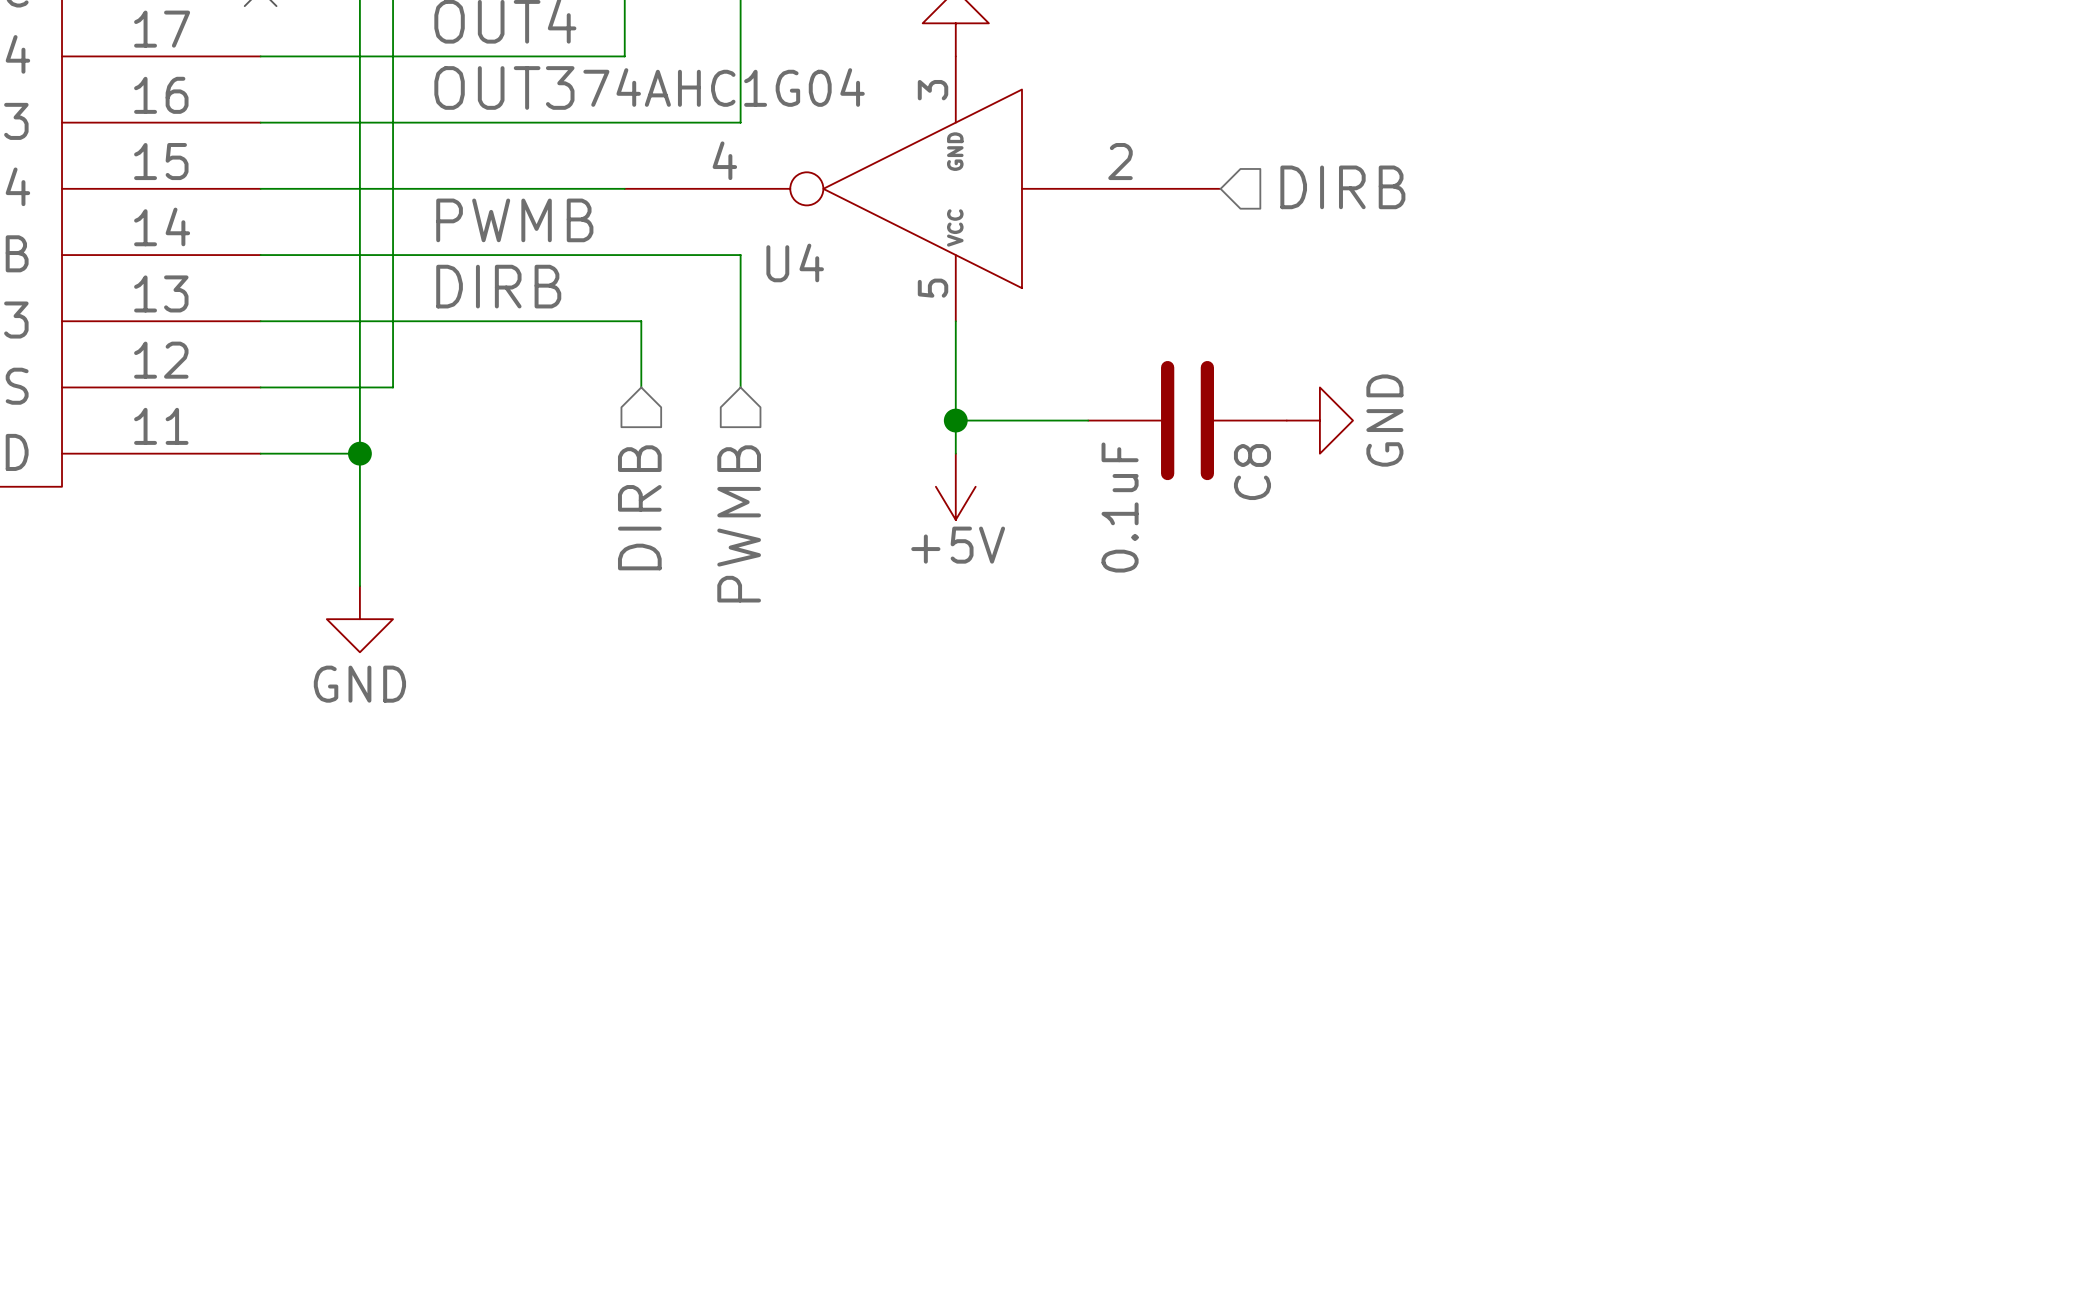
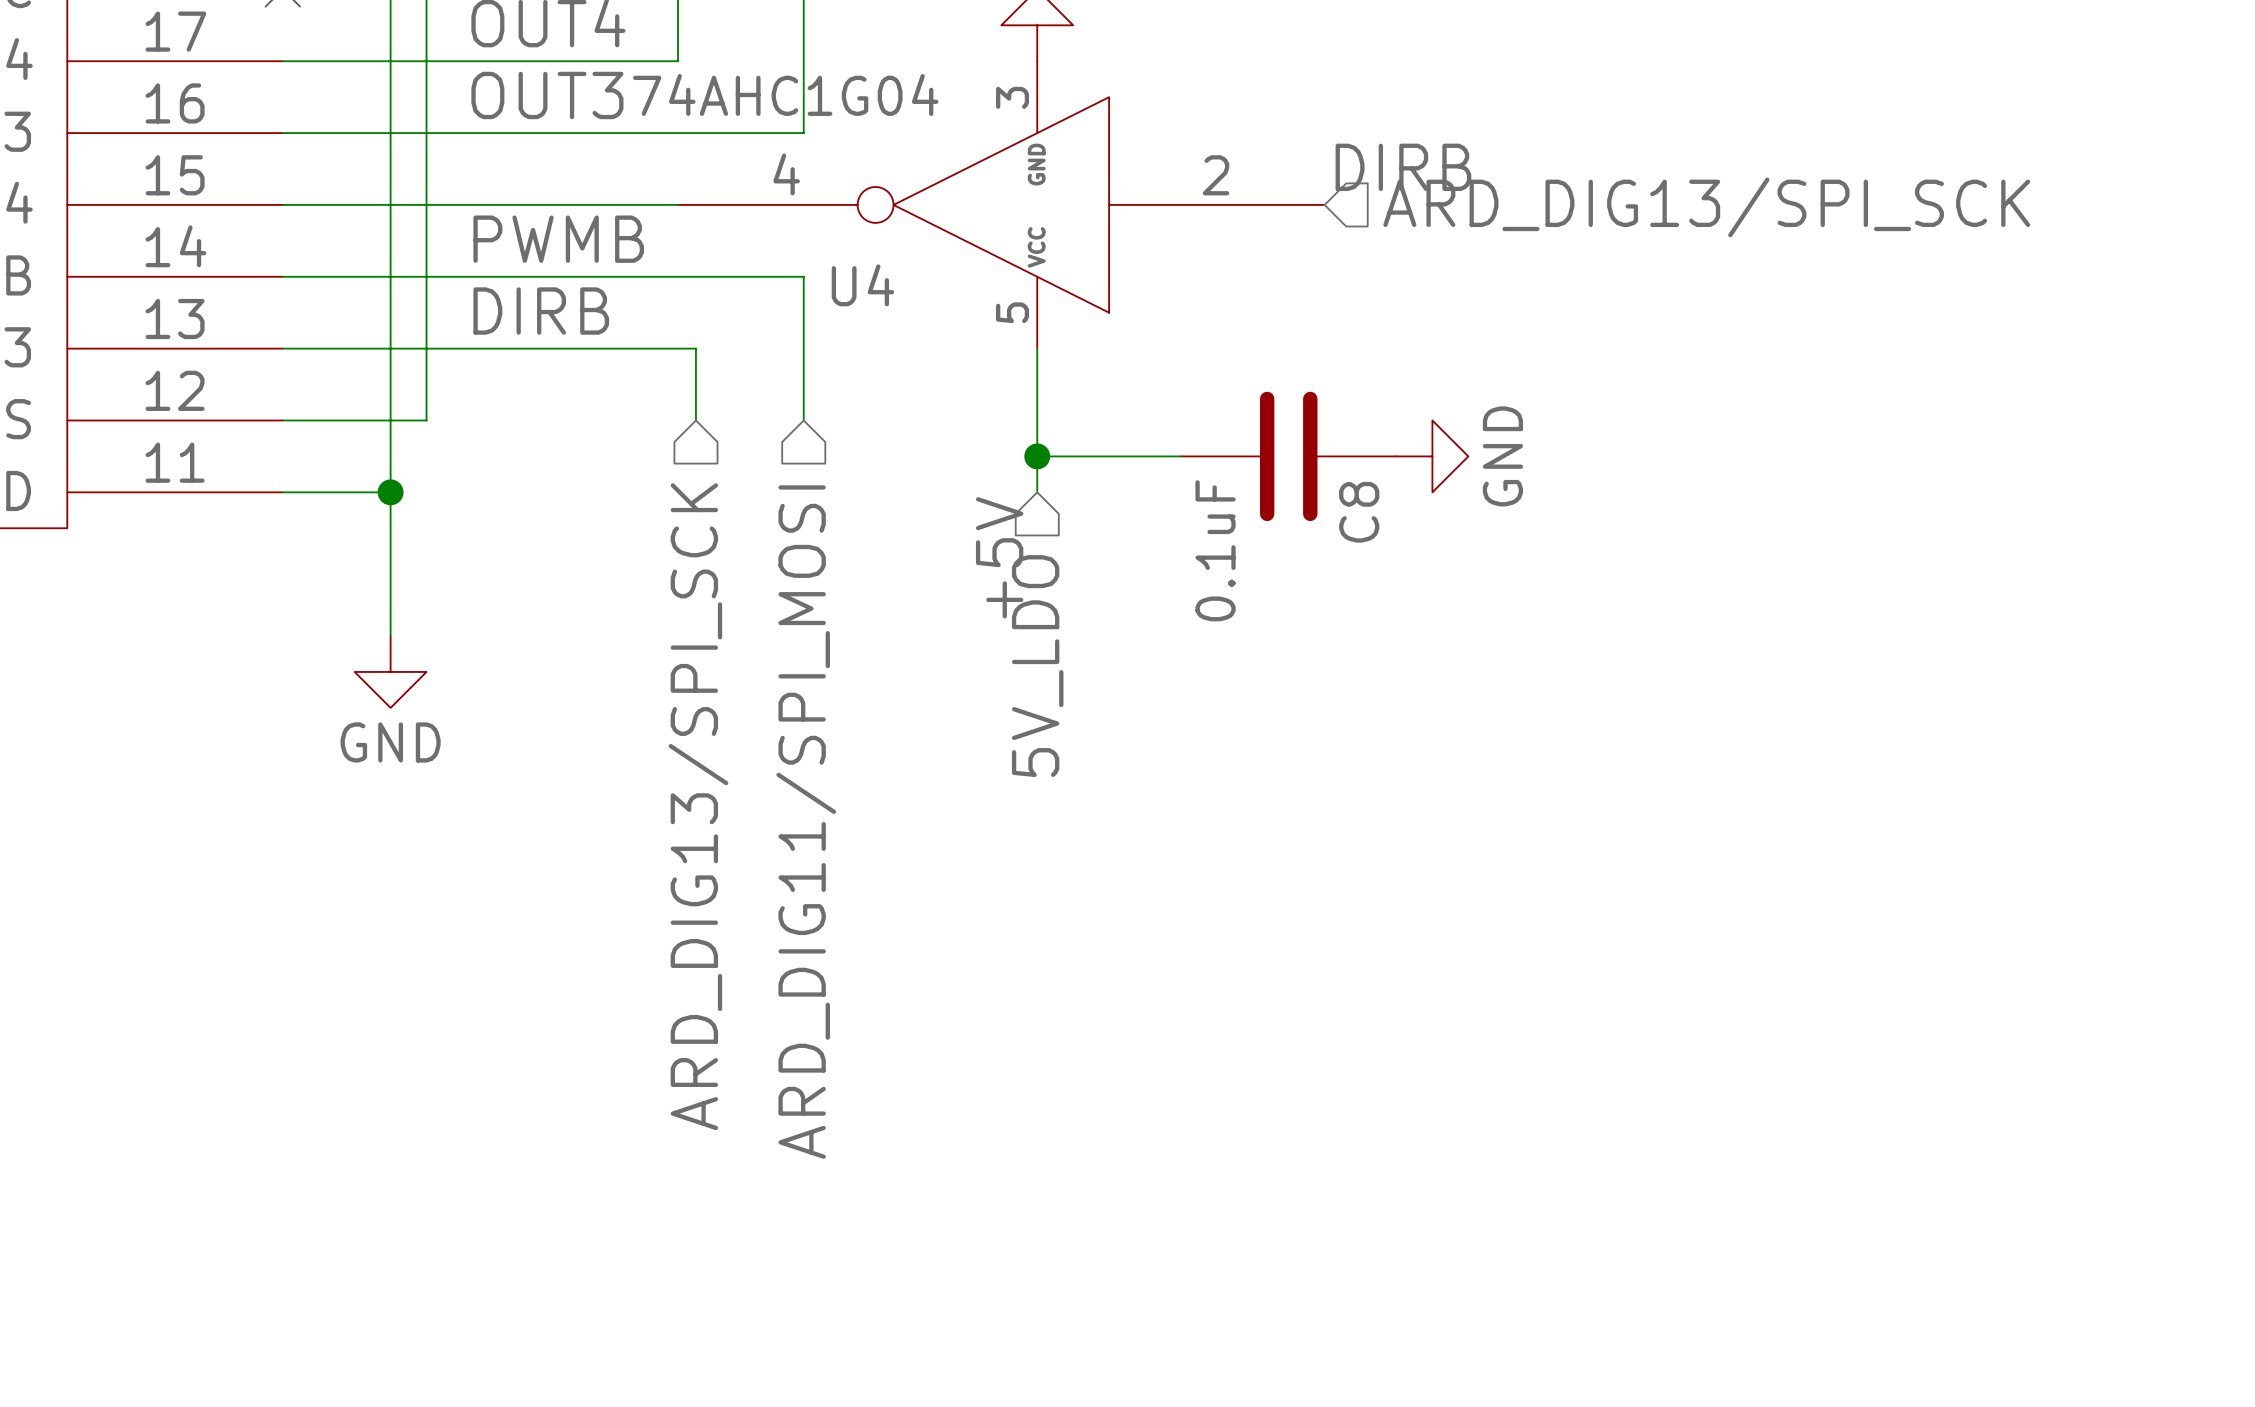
label: none -> DIRB (1403, 167)
hierarchical label: DIRB (1342, 187) -> ARD_DIG13/SPI_SCK (1706, 207)
power symbol: +5V (955, 486) -> none
hierarchical label: DIRB (639, 507) -> ARD_DIG13/SPI_SCK (698, 806)
label: none -> +5V (999, 557)
hierarchical label: PWMB (739, 523) -> ARD_DIG11/SPI_MOSI (806, 822)
hierarchical label: none -> 5V_LDO (1037, 666)

